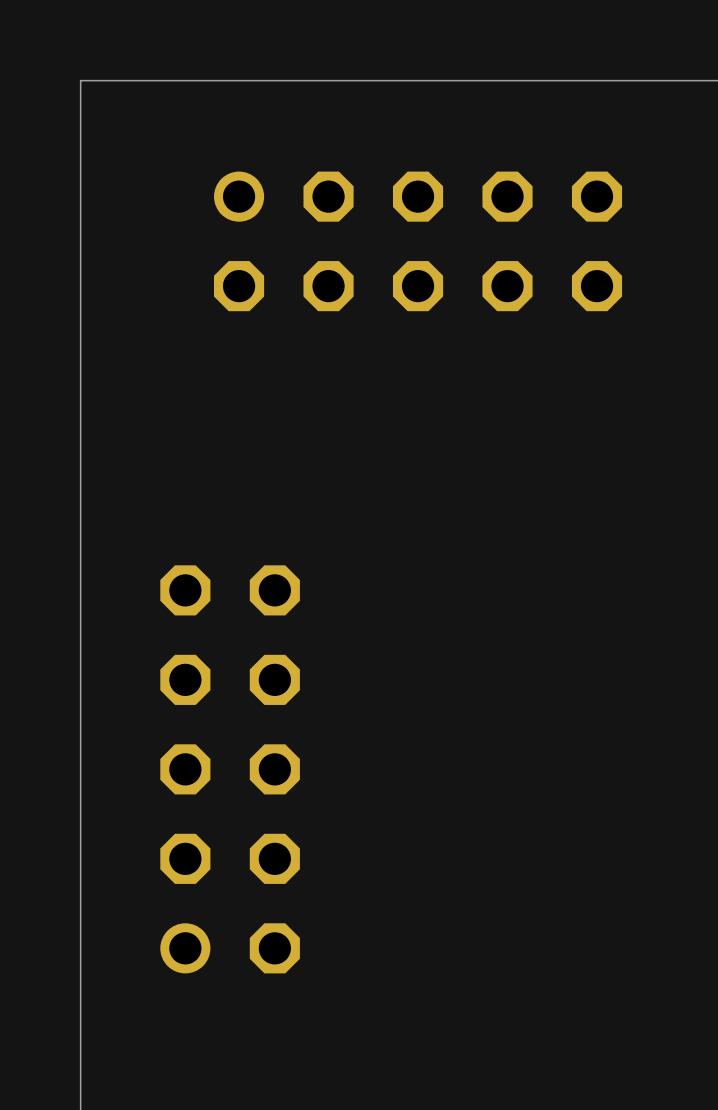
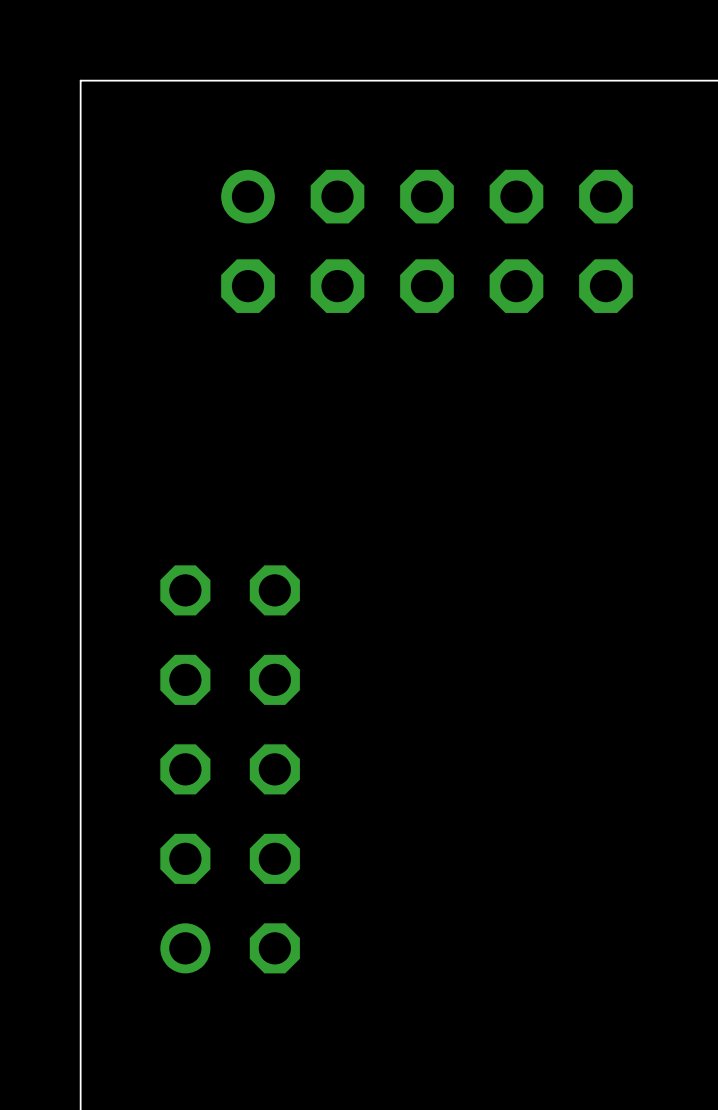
part footprint: [214, 171, 623, 312] -> [221, 169, 633, 313]

